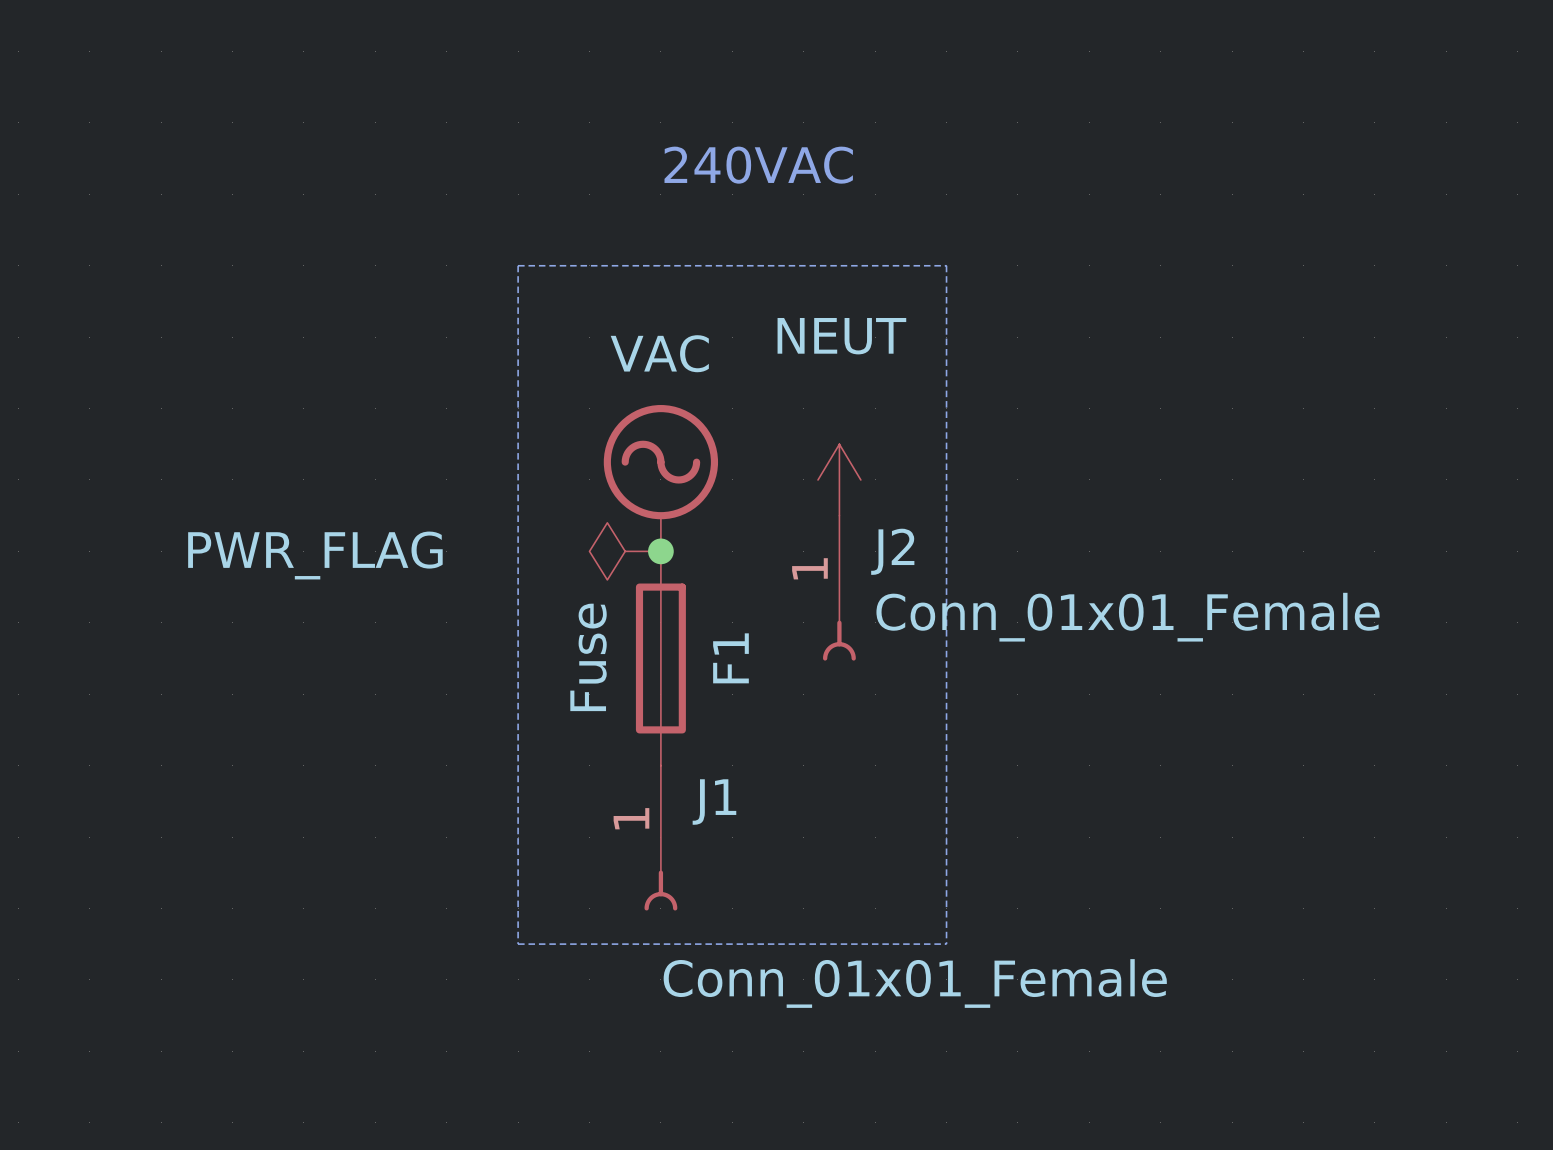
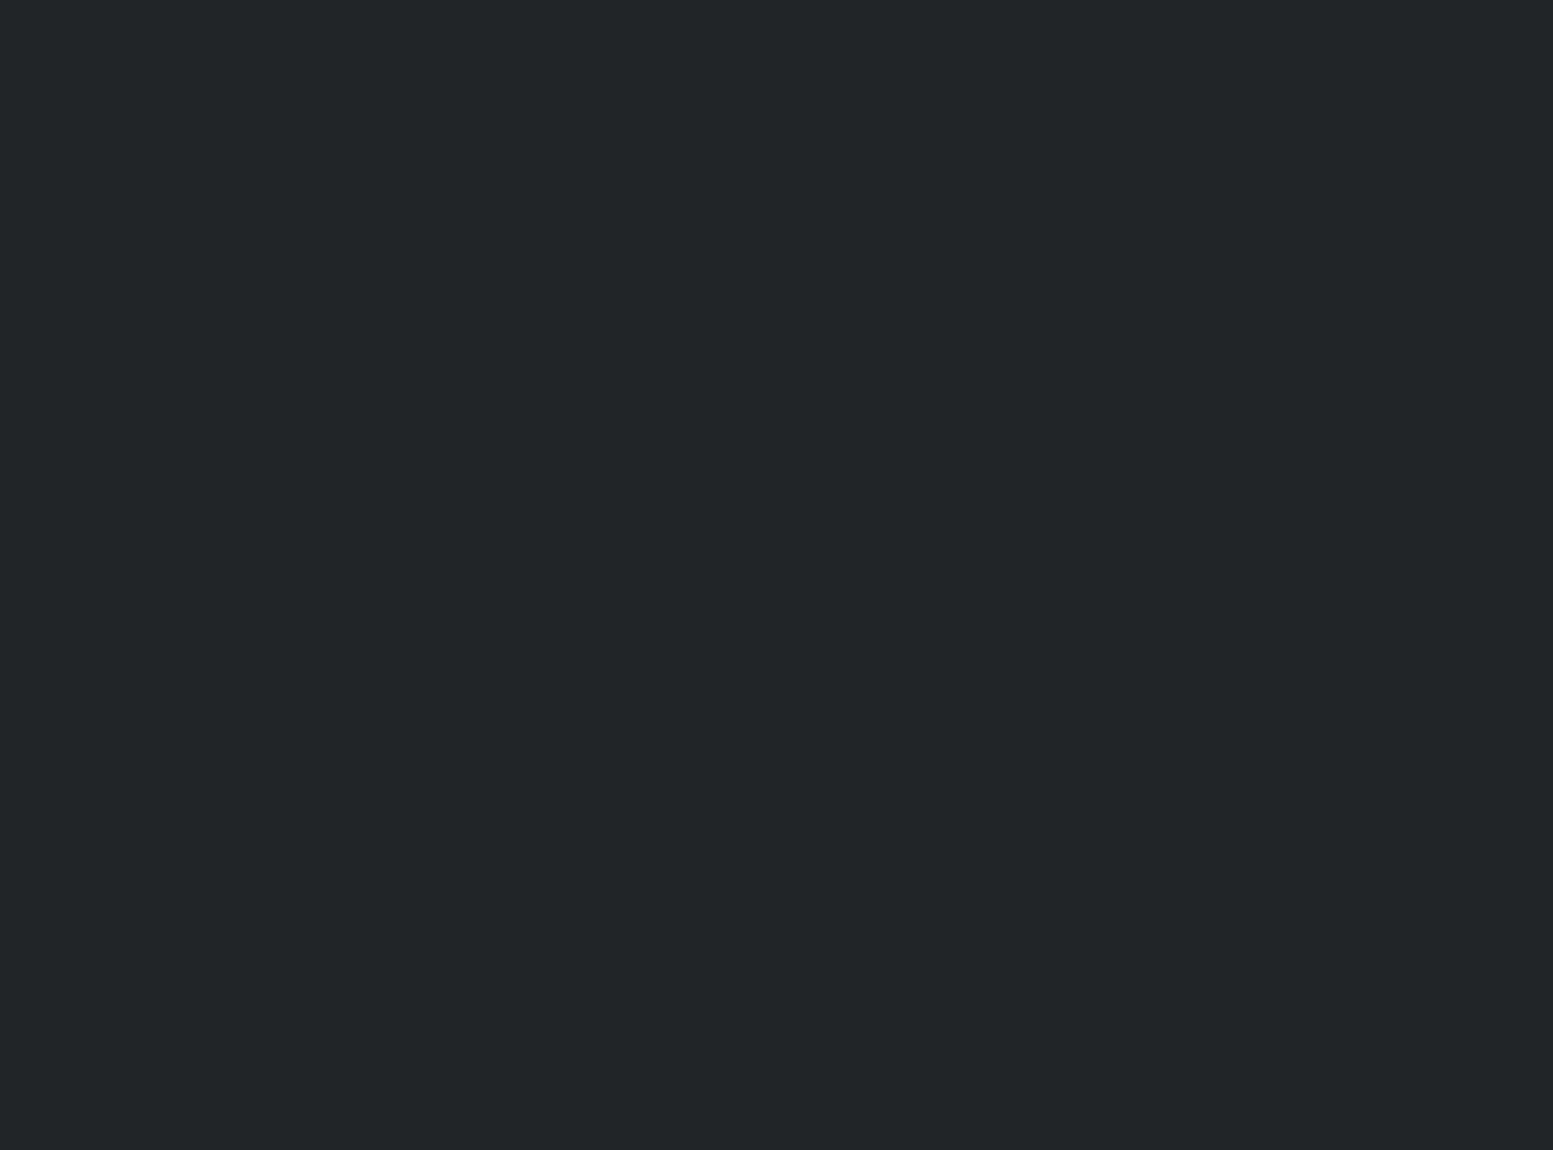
text: 240VAC (758, 165) -> none
line: (518, 265) (946, 265) (946, 944) (518, 944) (518, 265) -> none
power symbol: VAC (660, 478) -> none
power symbol: NEUT (839, 479) -> none
power symbol: PWR_FLAG (625, 551) -> none
junction: (660, 551) -> none
J2: Conn_01x01_Female (839, 588) -> none
F1: Fuse (660, 658) -> none
J1: Conn_01x01_Female (660, 838) -> none

